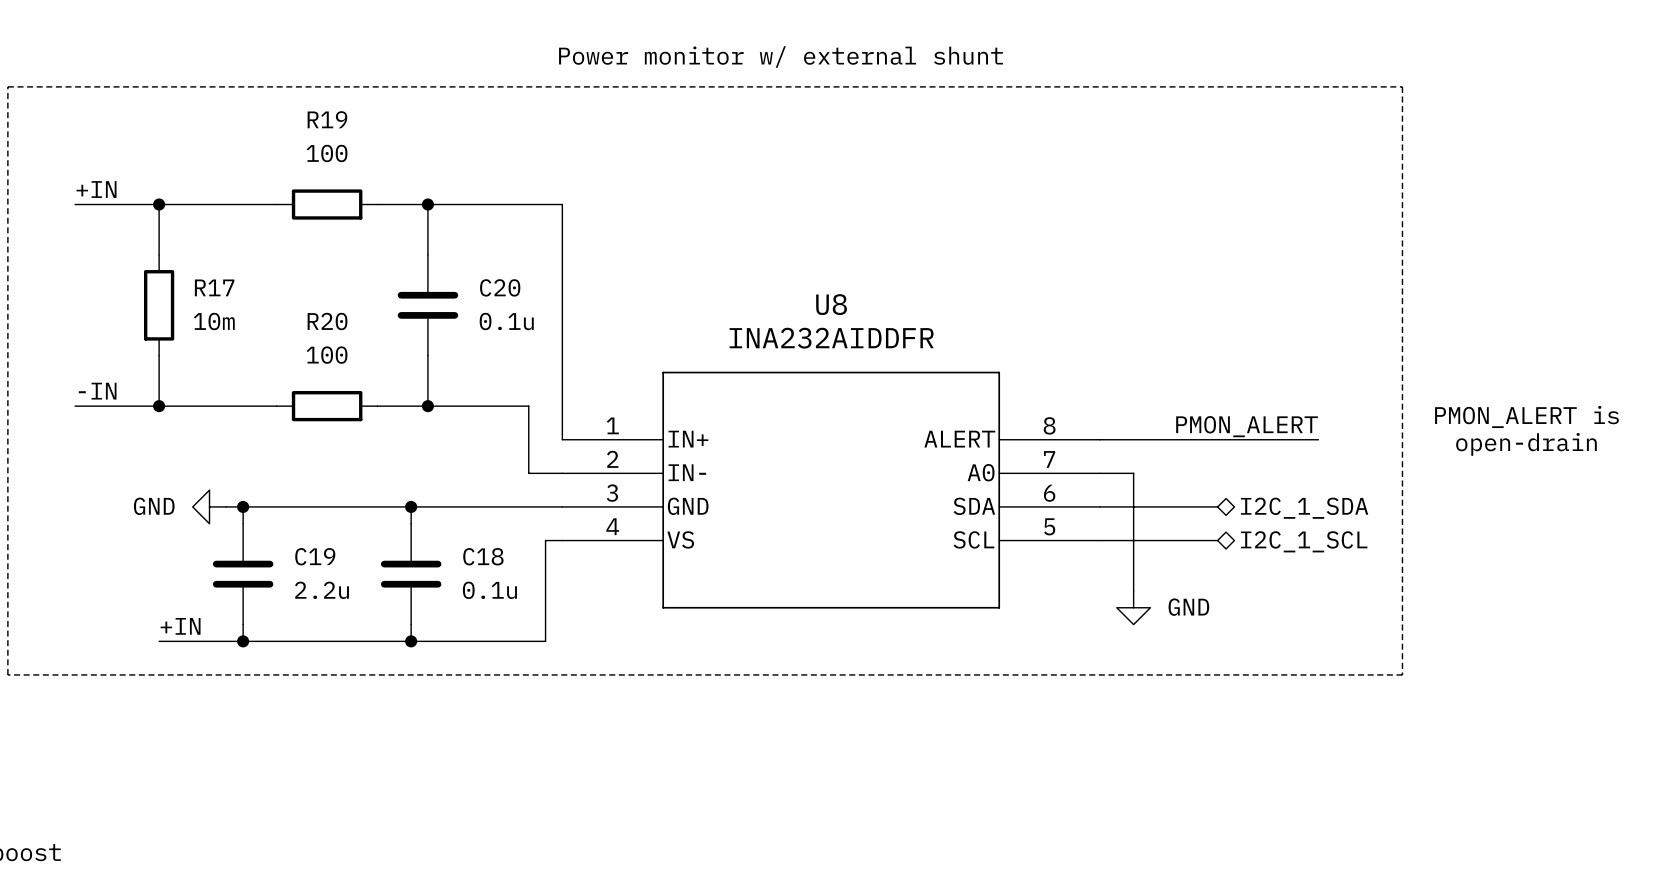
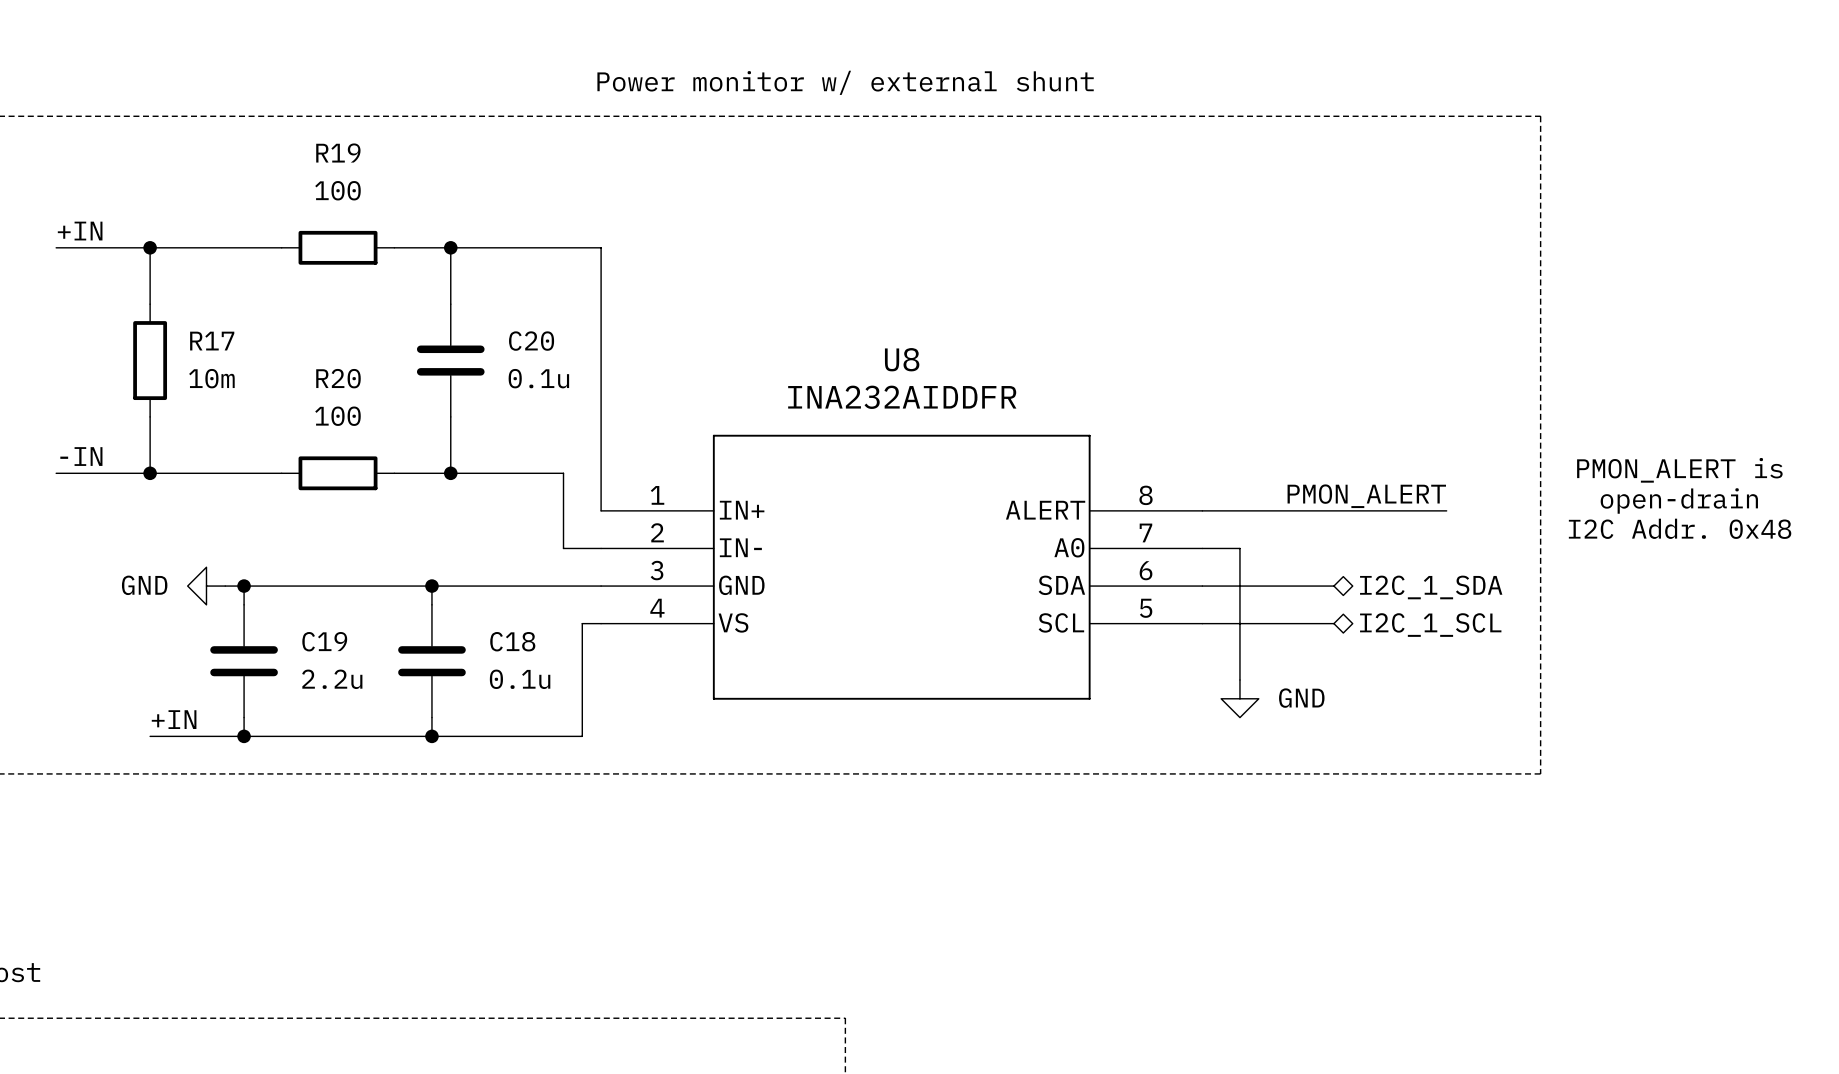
text position: PMON_ALERT is (1526, 416) -> PMON_ALERT is (1679, 470)
text position: open-drain (1526, 444) -> open-drain (1679, 500)
text: none -> I2C Addr. 0x48 (1680, 528)

